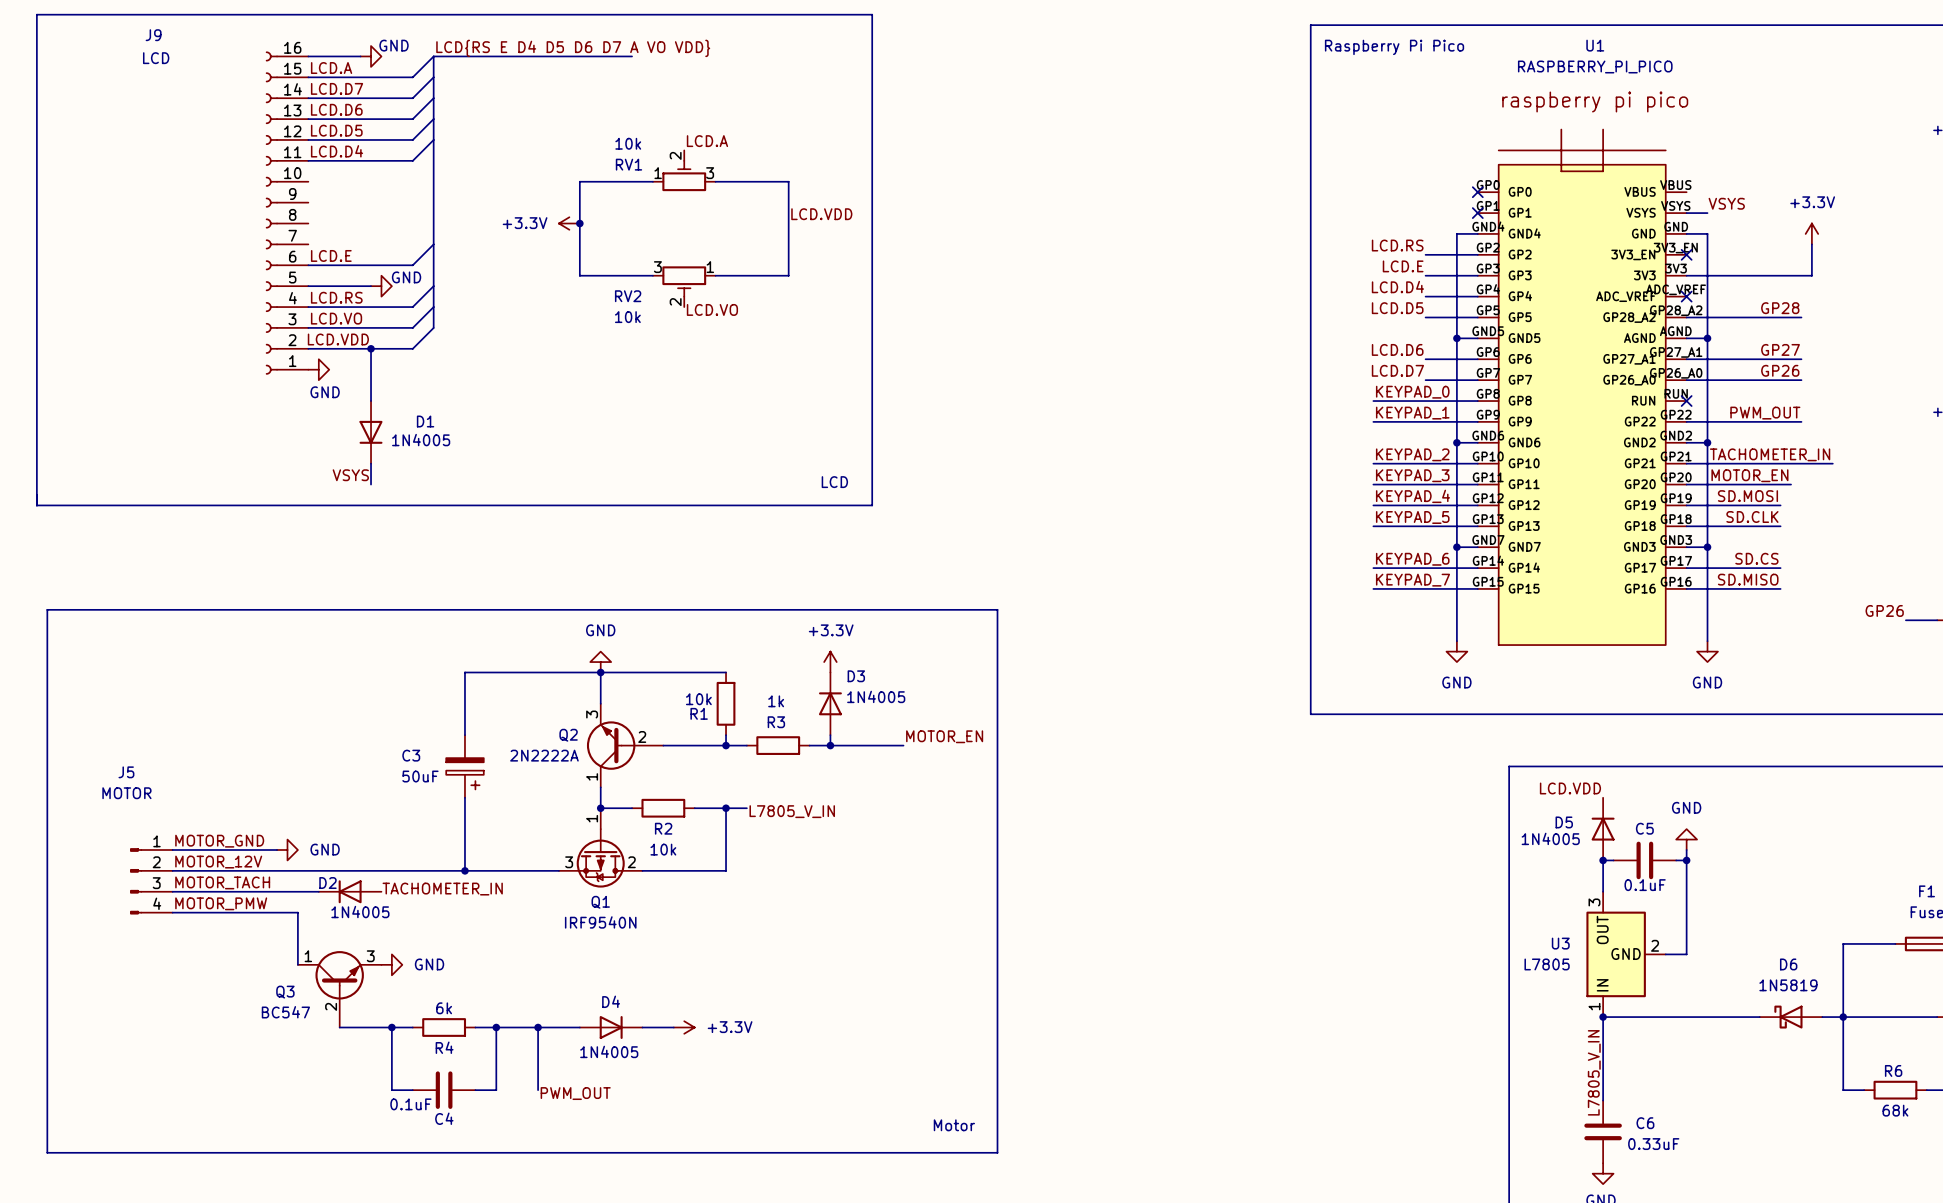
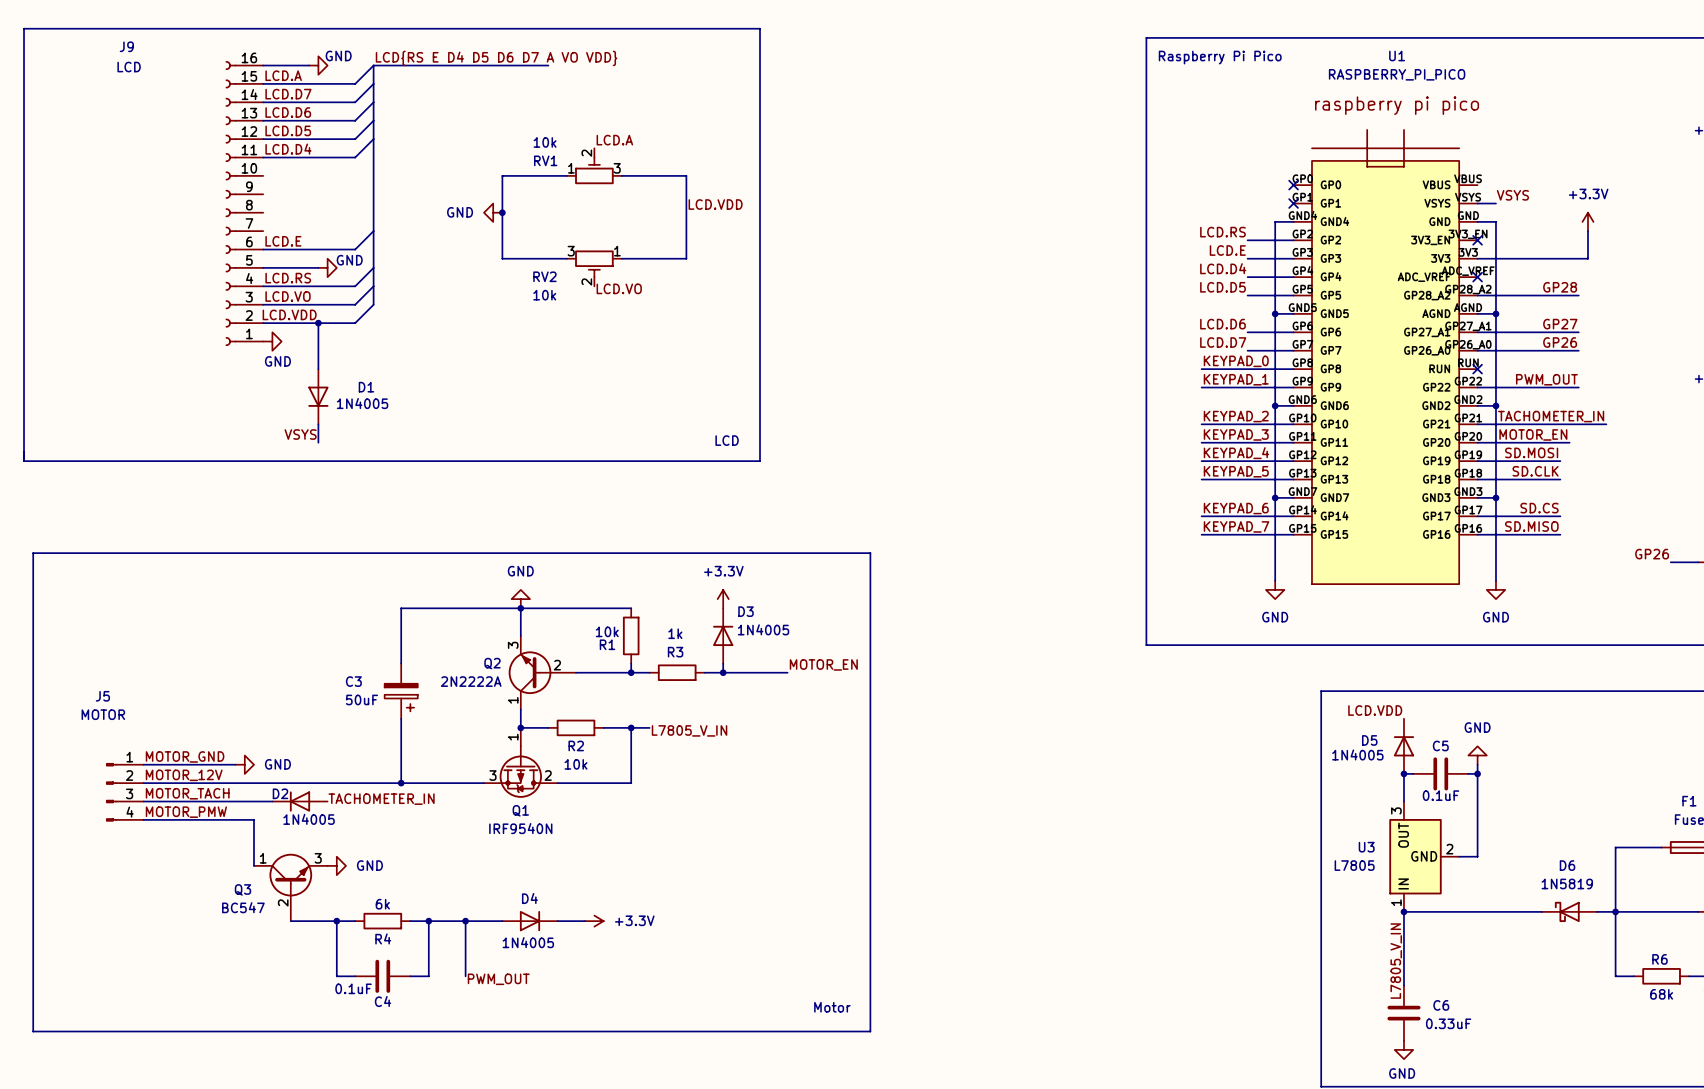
power symbol: +3.3V (569, 223) -> GND (493, 212)

